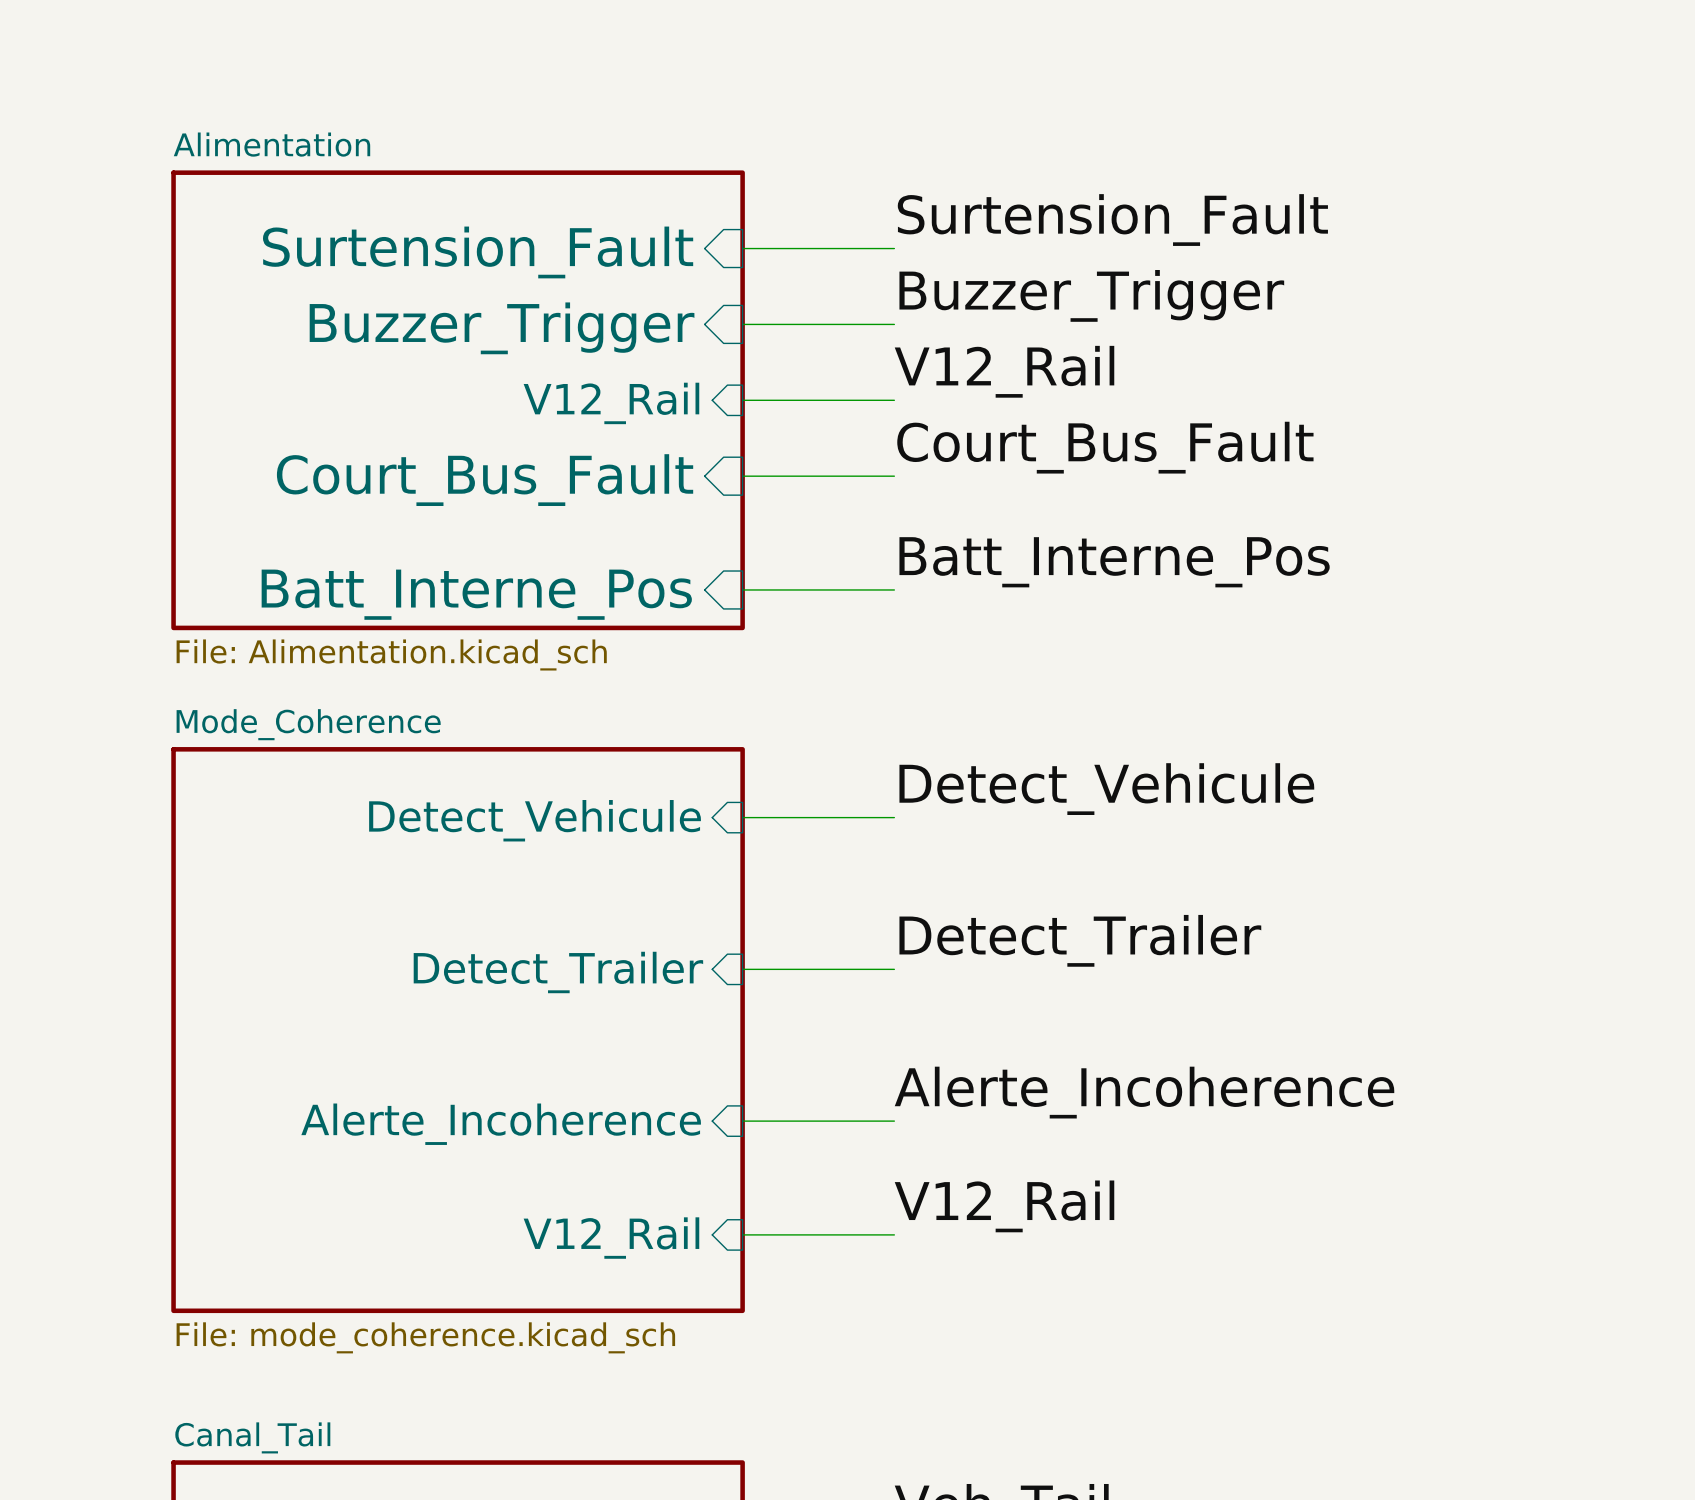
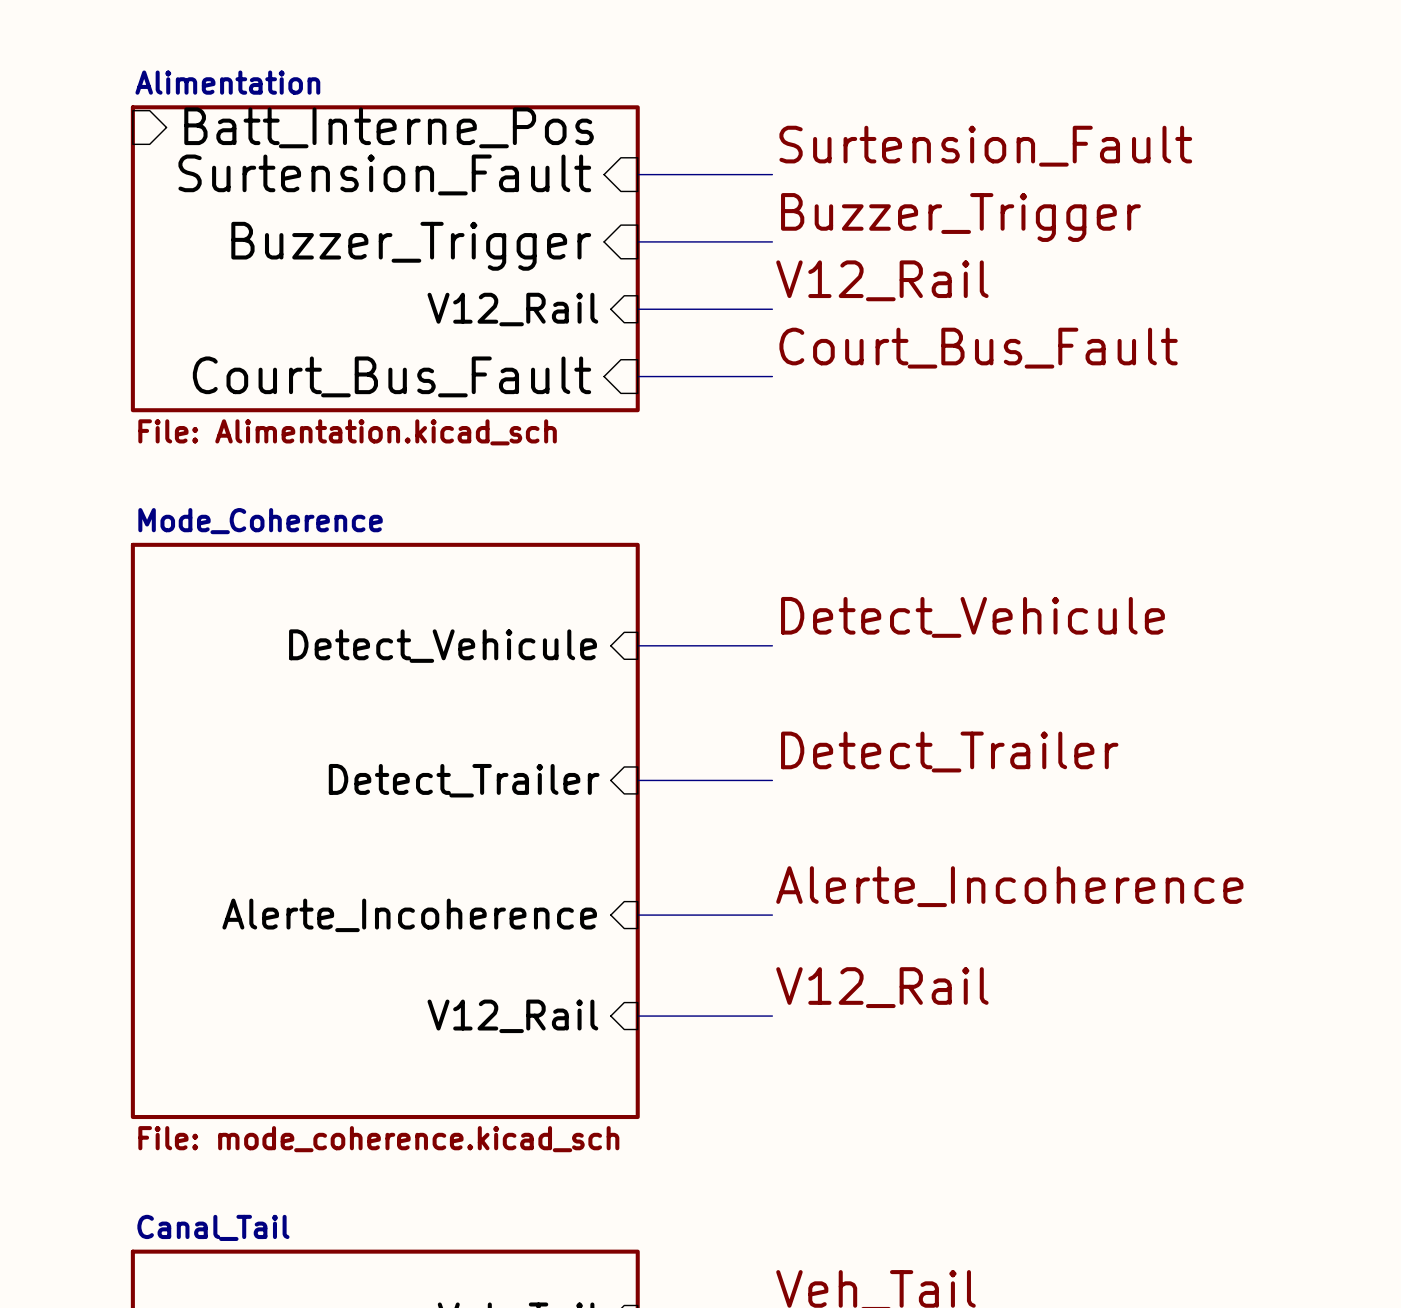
sheet Alimentation: none -> File: Alimentation.kicad_sch (385, 258)
sheet Alimentation: File: Alimentation.kicad_sch (458, 400) -> none
label: Batt_Interne_Pos (1114, 562) -> none
wire: (742, 589) (894, 589) -> none
sheet pin rotation: 0° (476, 594) -> 180° (389, 127)
label position: Detect_Vehicule (1106, 789) -> Detect_Vehicule (972, 617)
wire: (742, 817) (894, 817) -> (637, 645) (772, 645)
sheet pin position: Detect_Vehicule (535, 820) -> Detect_Vehicule (443, 646)
label position: Detect_Trailer (1080, 940) -> Detect_Trailer (949, 752)
wire: (742, 969) (894, 969) -> (637, 780) (772, 780)
sheet pin position: Detect_Trailer (558, 972) -> Detect_Trailer (464, 780)
sheet Mode_Coherence: none -> File: mode_coherence.kicad_sch (385, 830)
sheet Mode_Coherence: File: mode_coherence.kicad_sch (458, 1030) -> none
label position: Alerte_Incoherence (1144, 1092) -> Alerte_Incoherence (1009, 886)
wire: (742, 1121) (894, 1121) -> (637, 915) (772, 915)
sheet pin position: Alerte_Incoherence (501, 1124) -> Alerte_Incoherence (409, 915)
label position: V12_Rail (1004, 1206) -> V12_Rail (882, 987)
wire: (742, 1234) (894, 1234) -> (637, 1016) (772, 1016)
sheet pin position: V12_Rail (611, 1238) -> V12_Rail (512, 1016)

